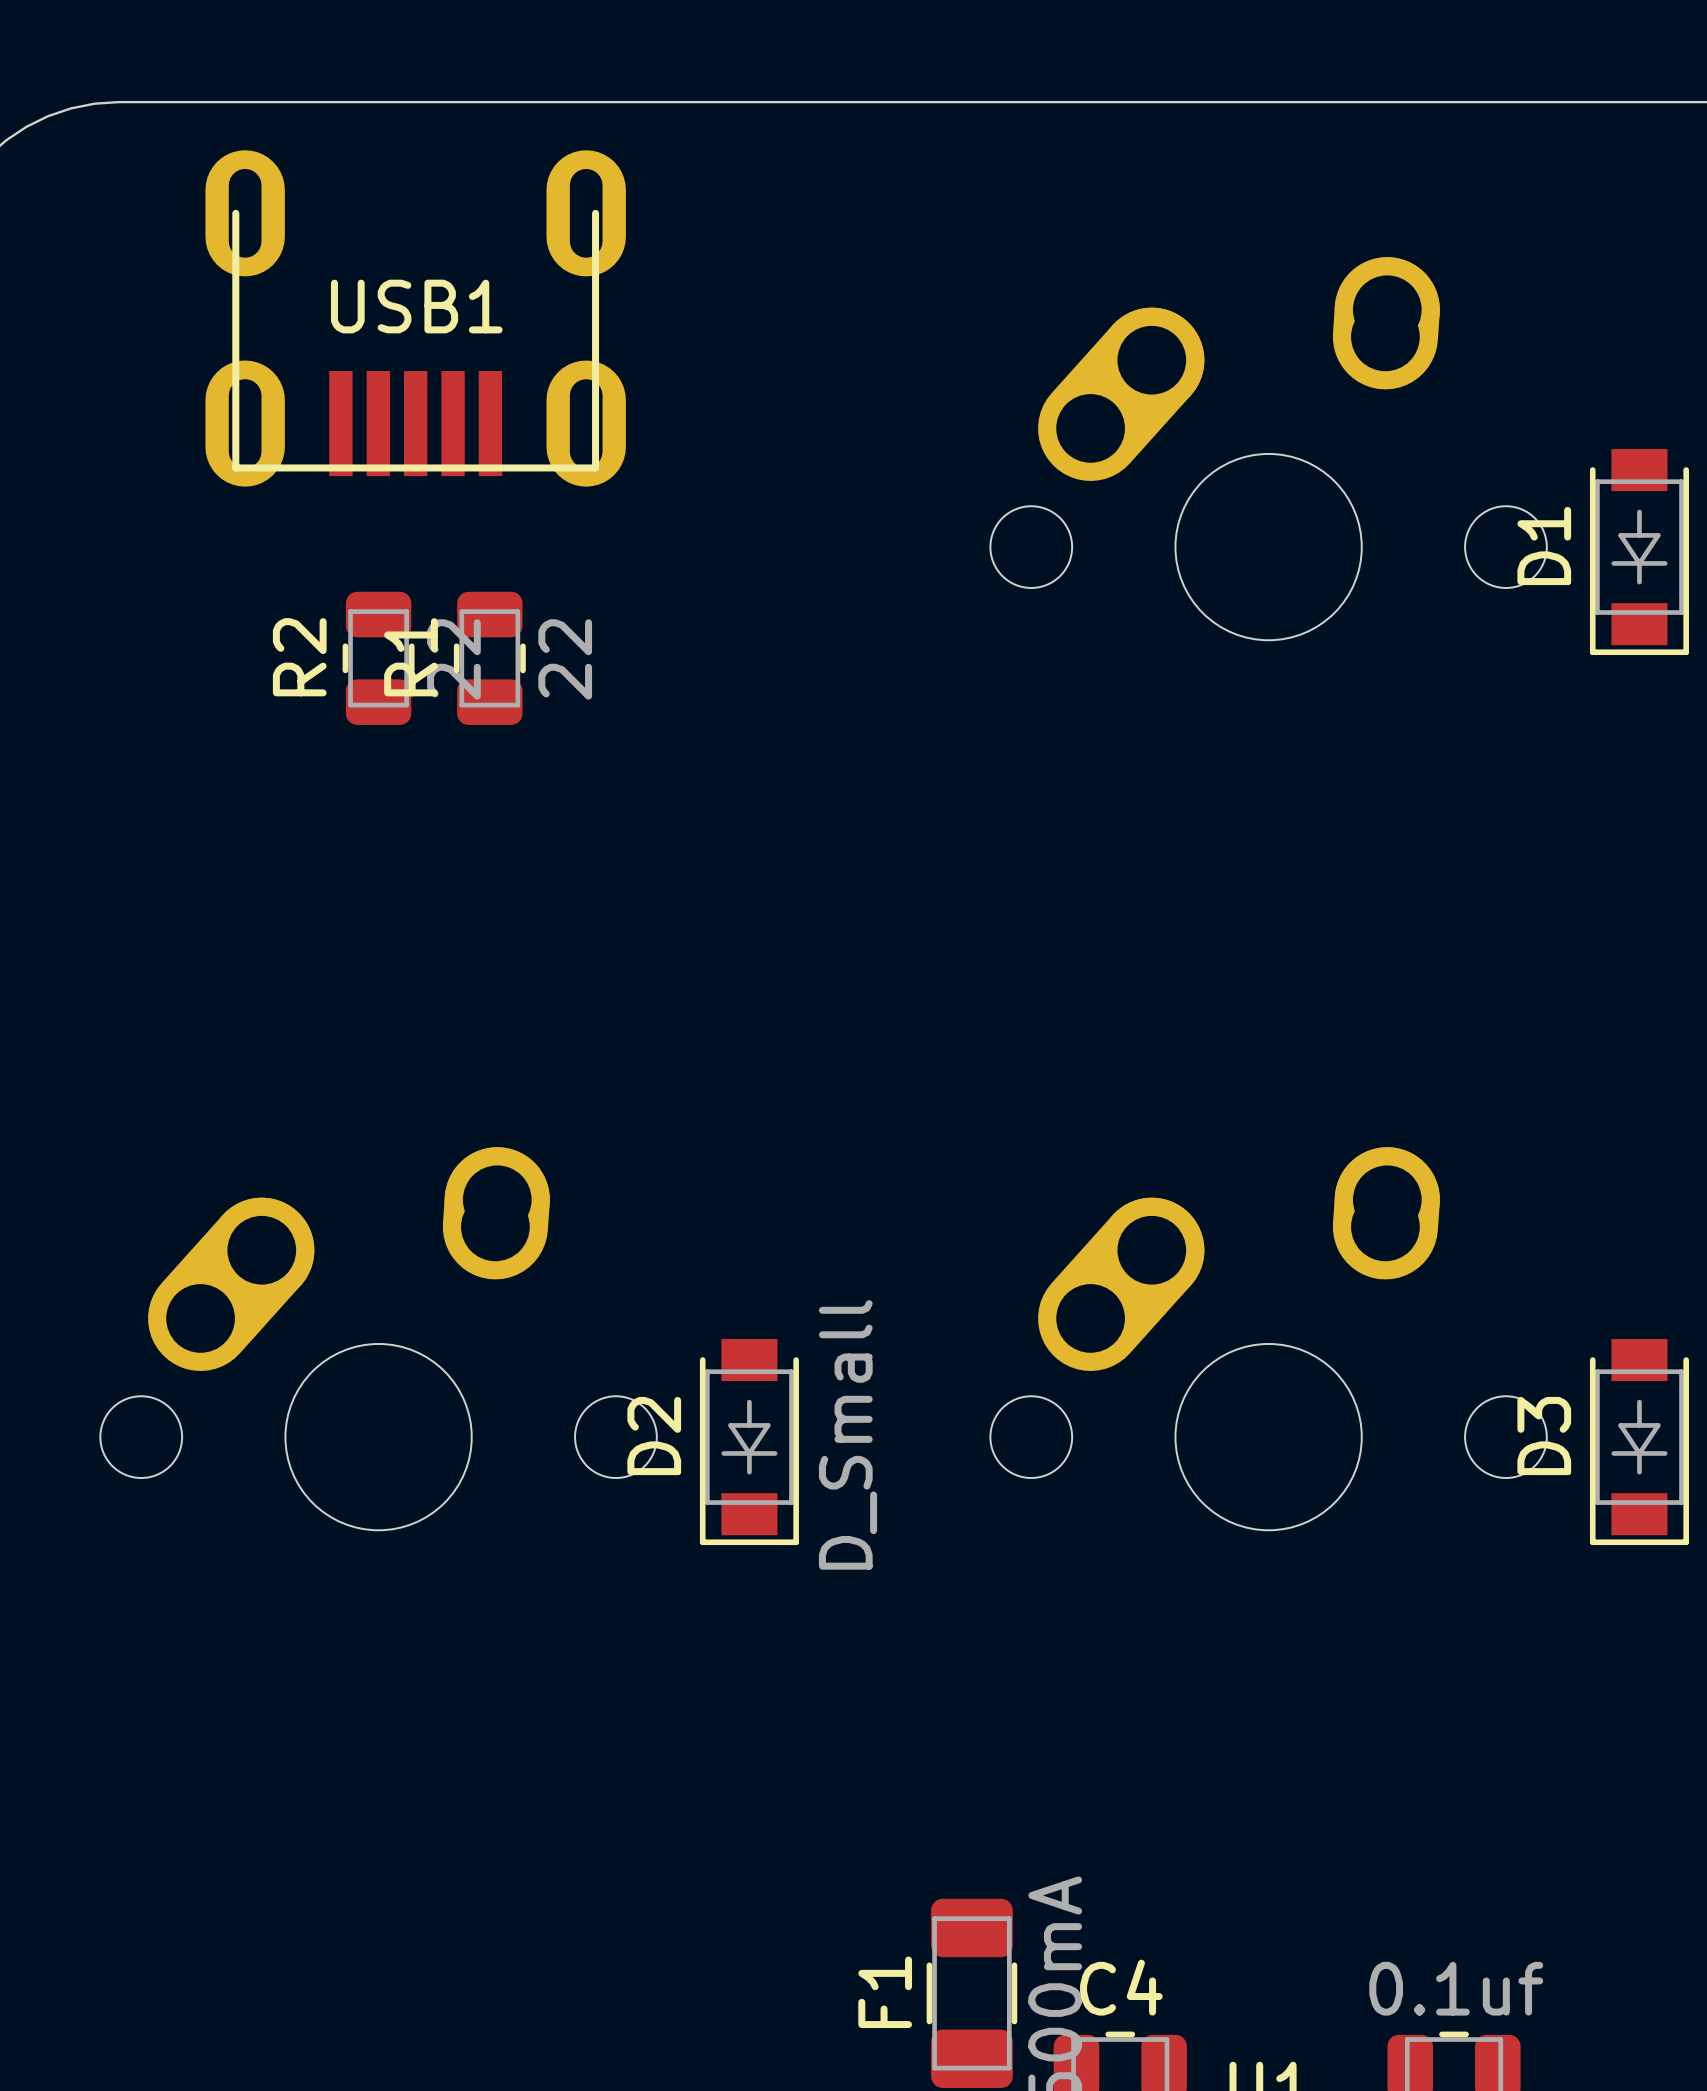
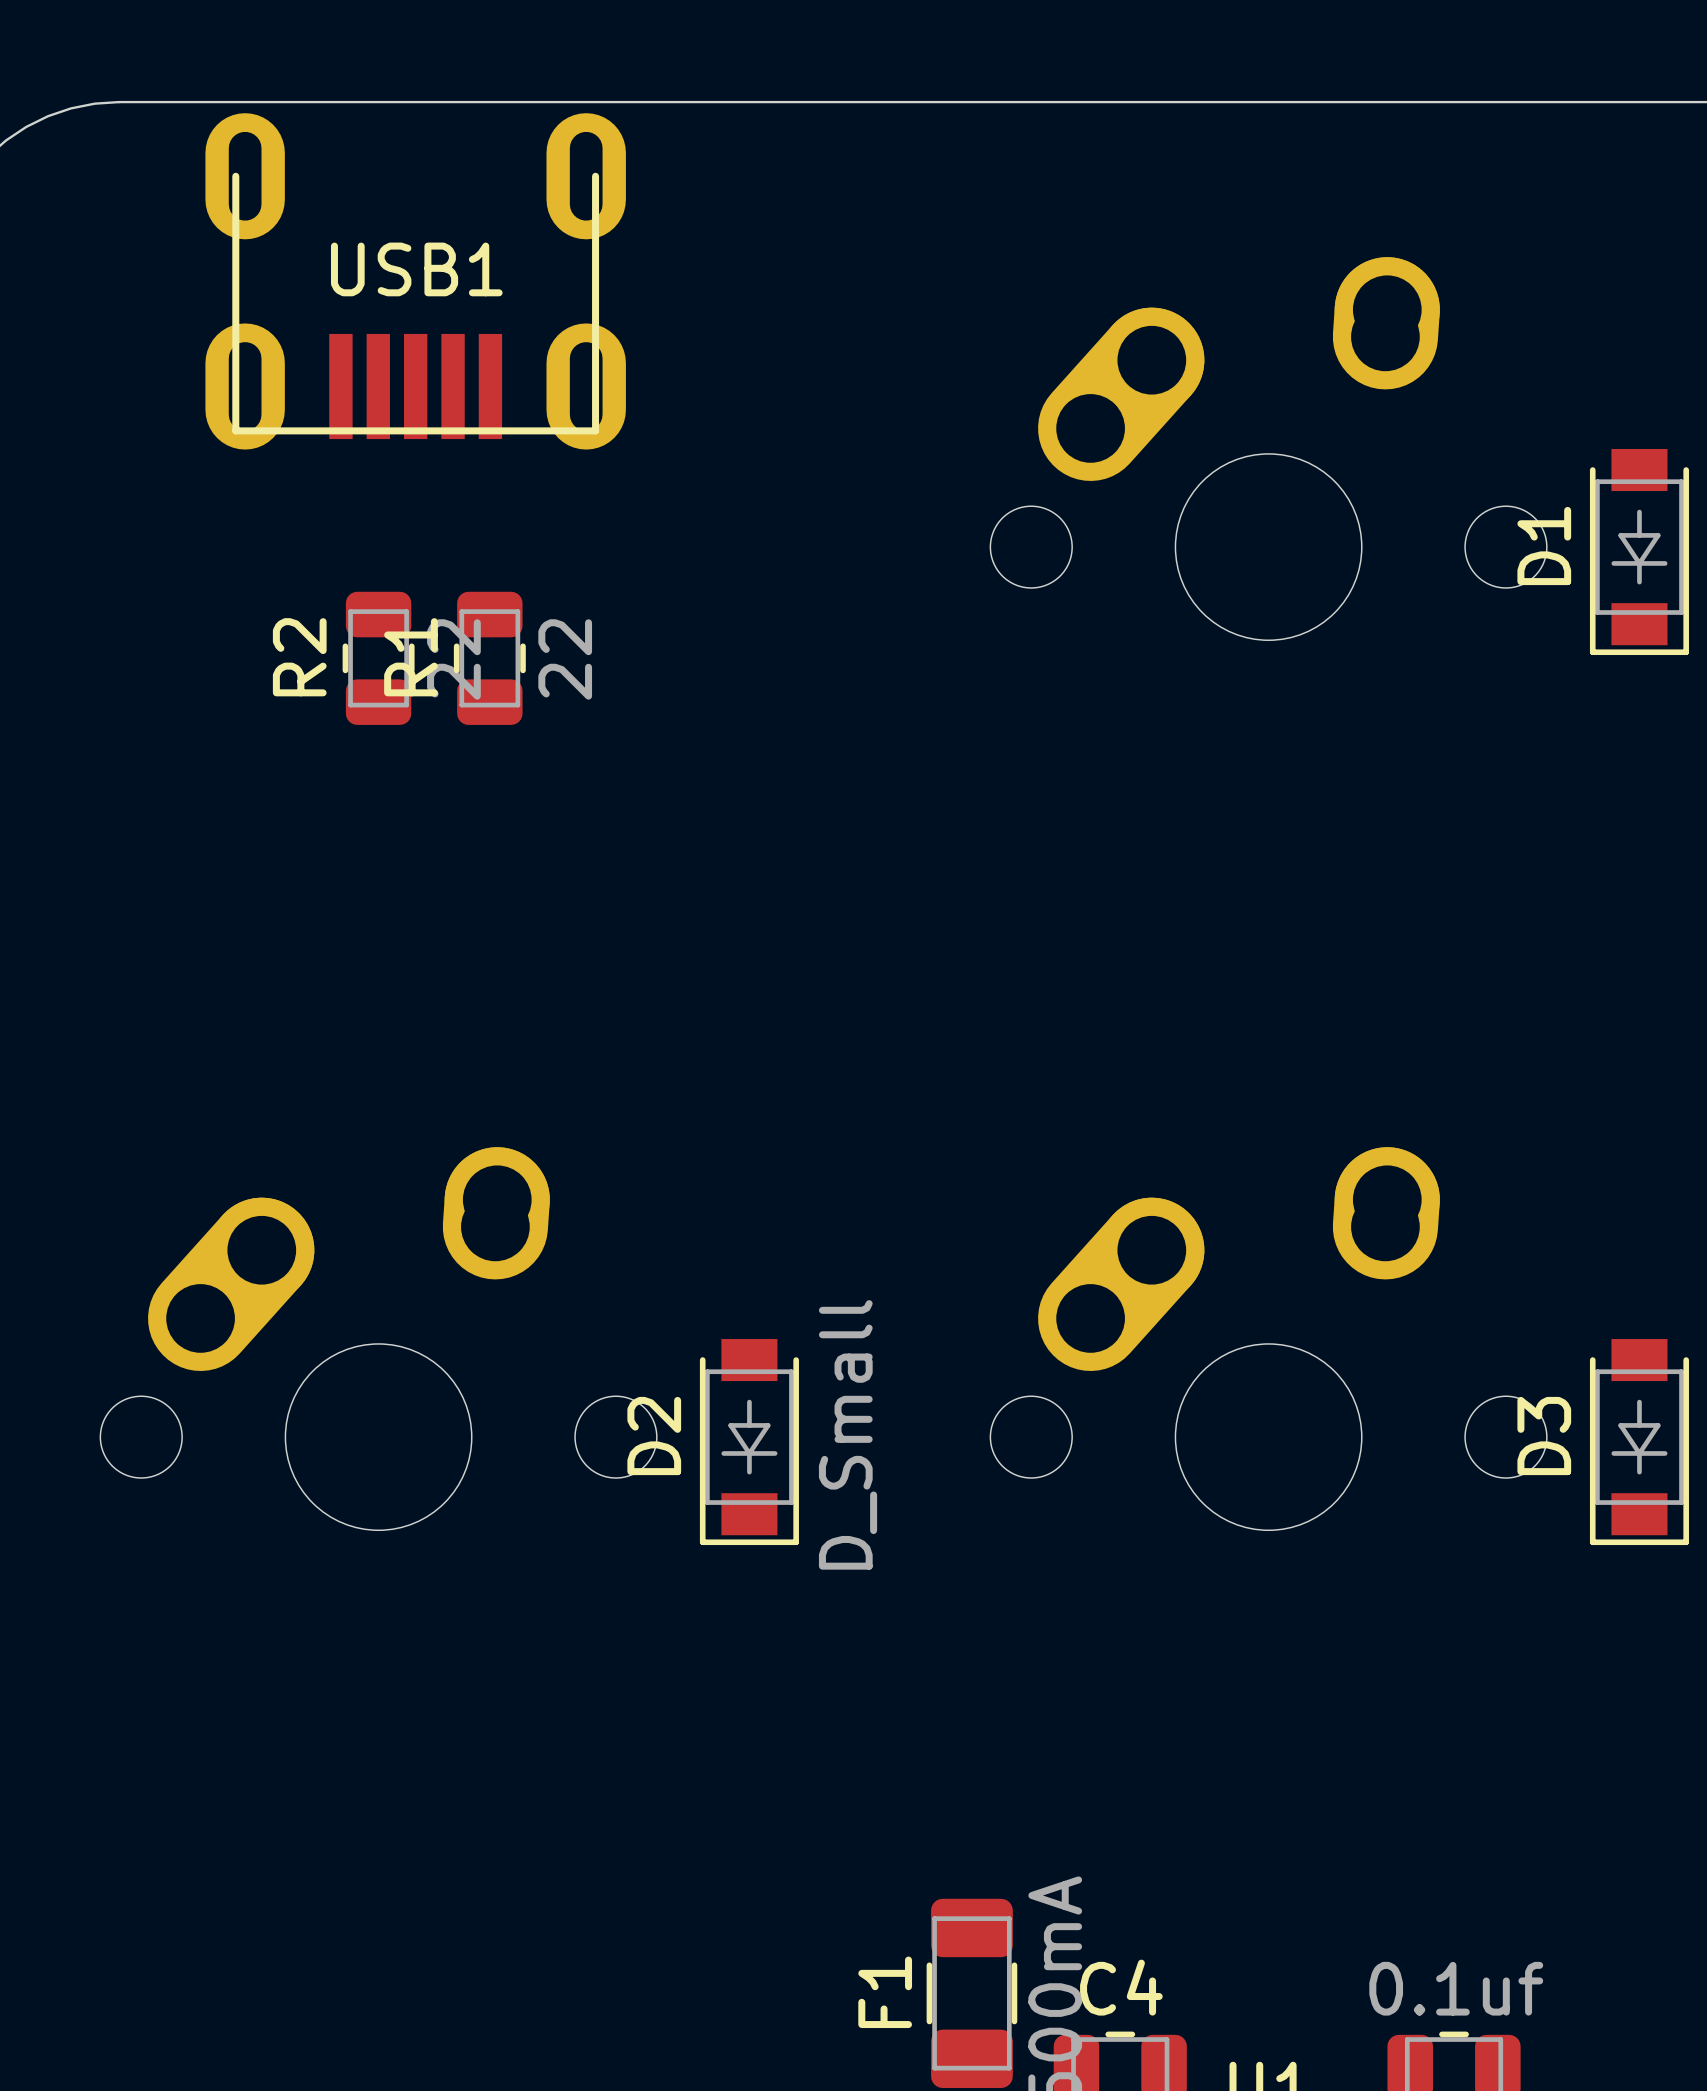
USB1 position: (415, 318) -> (415, 281)

